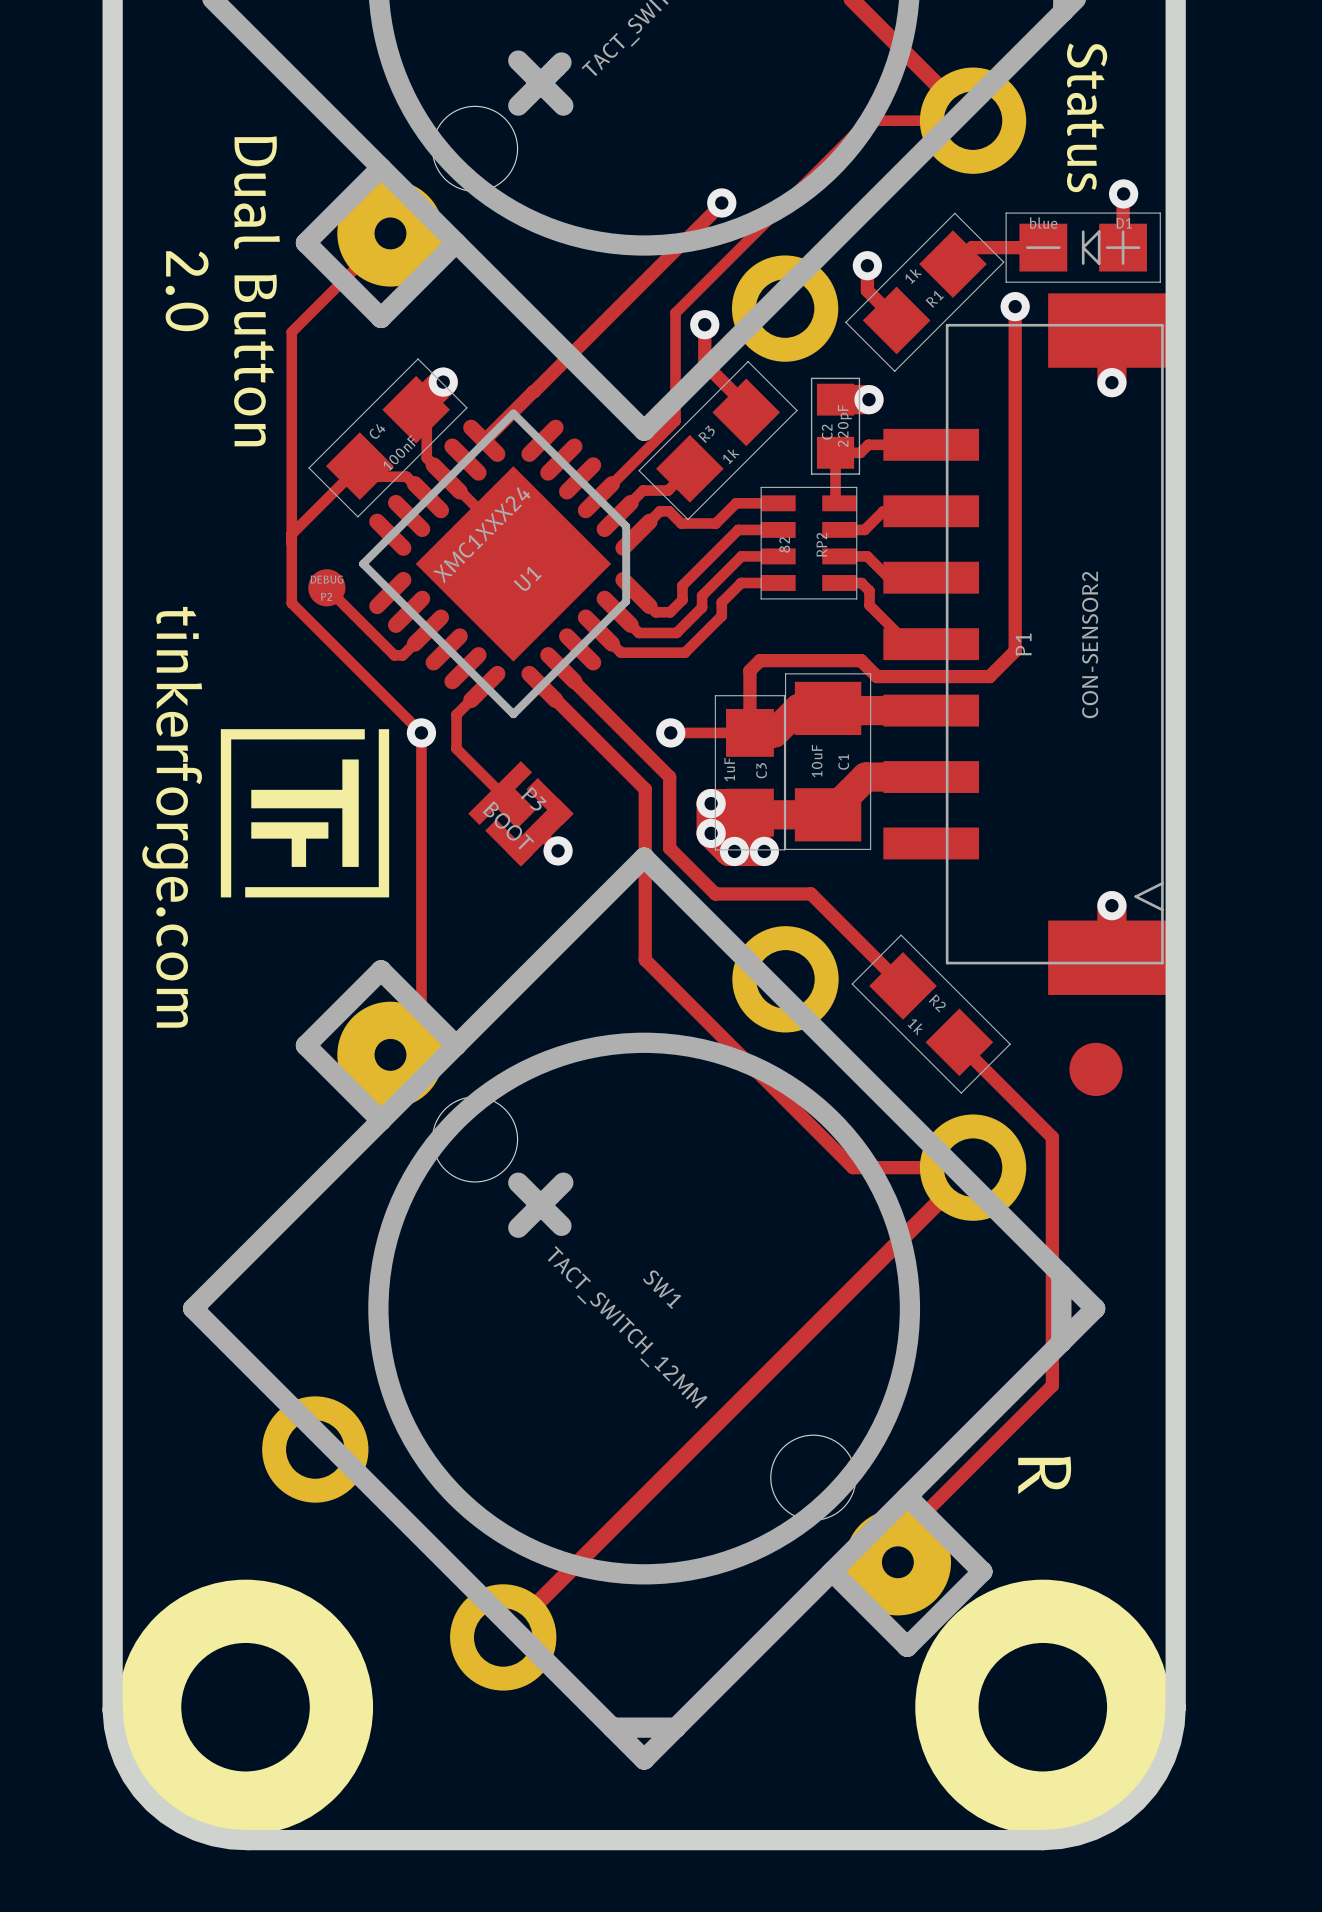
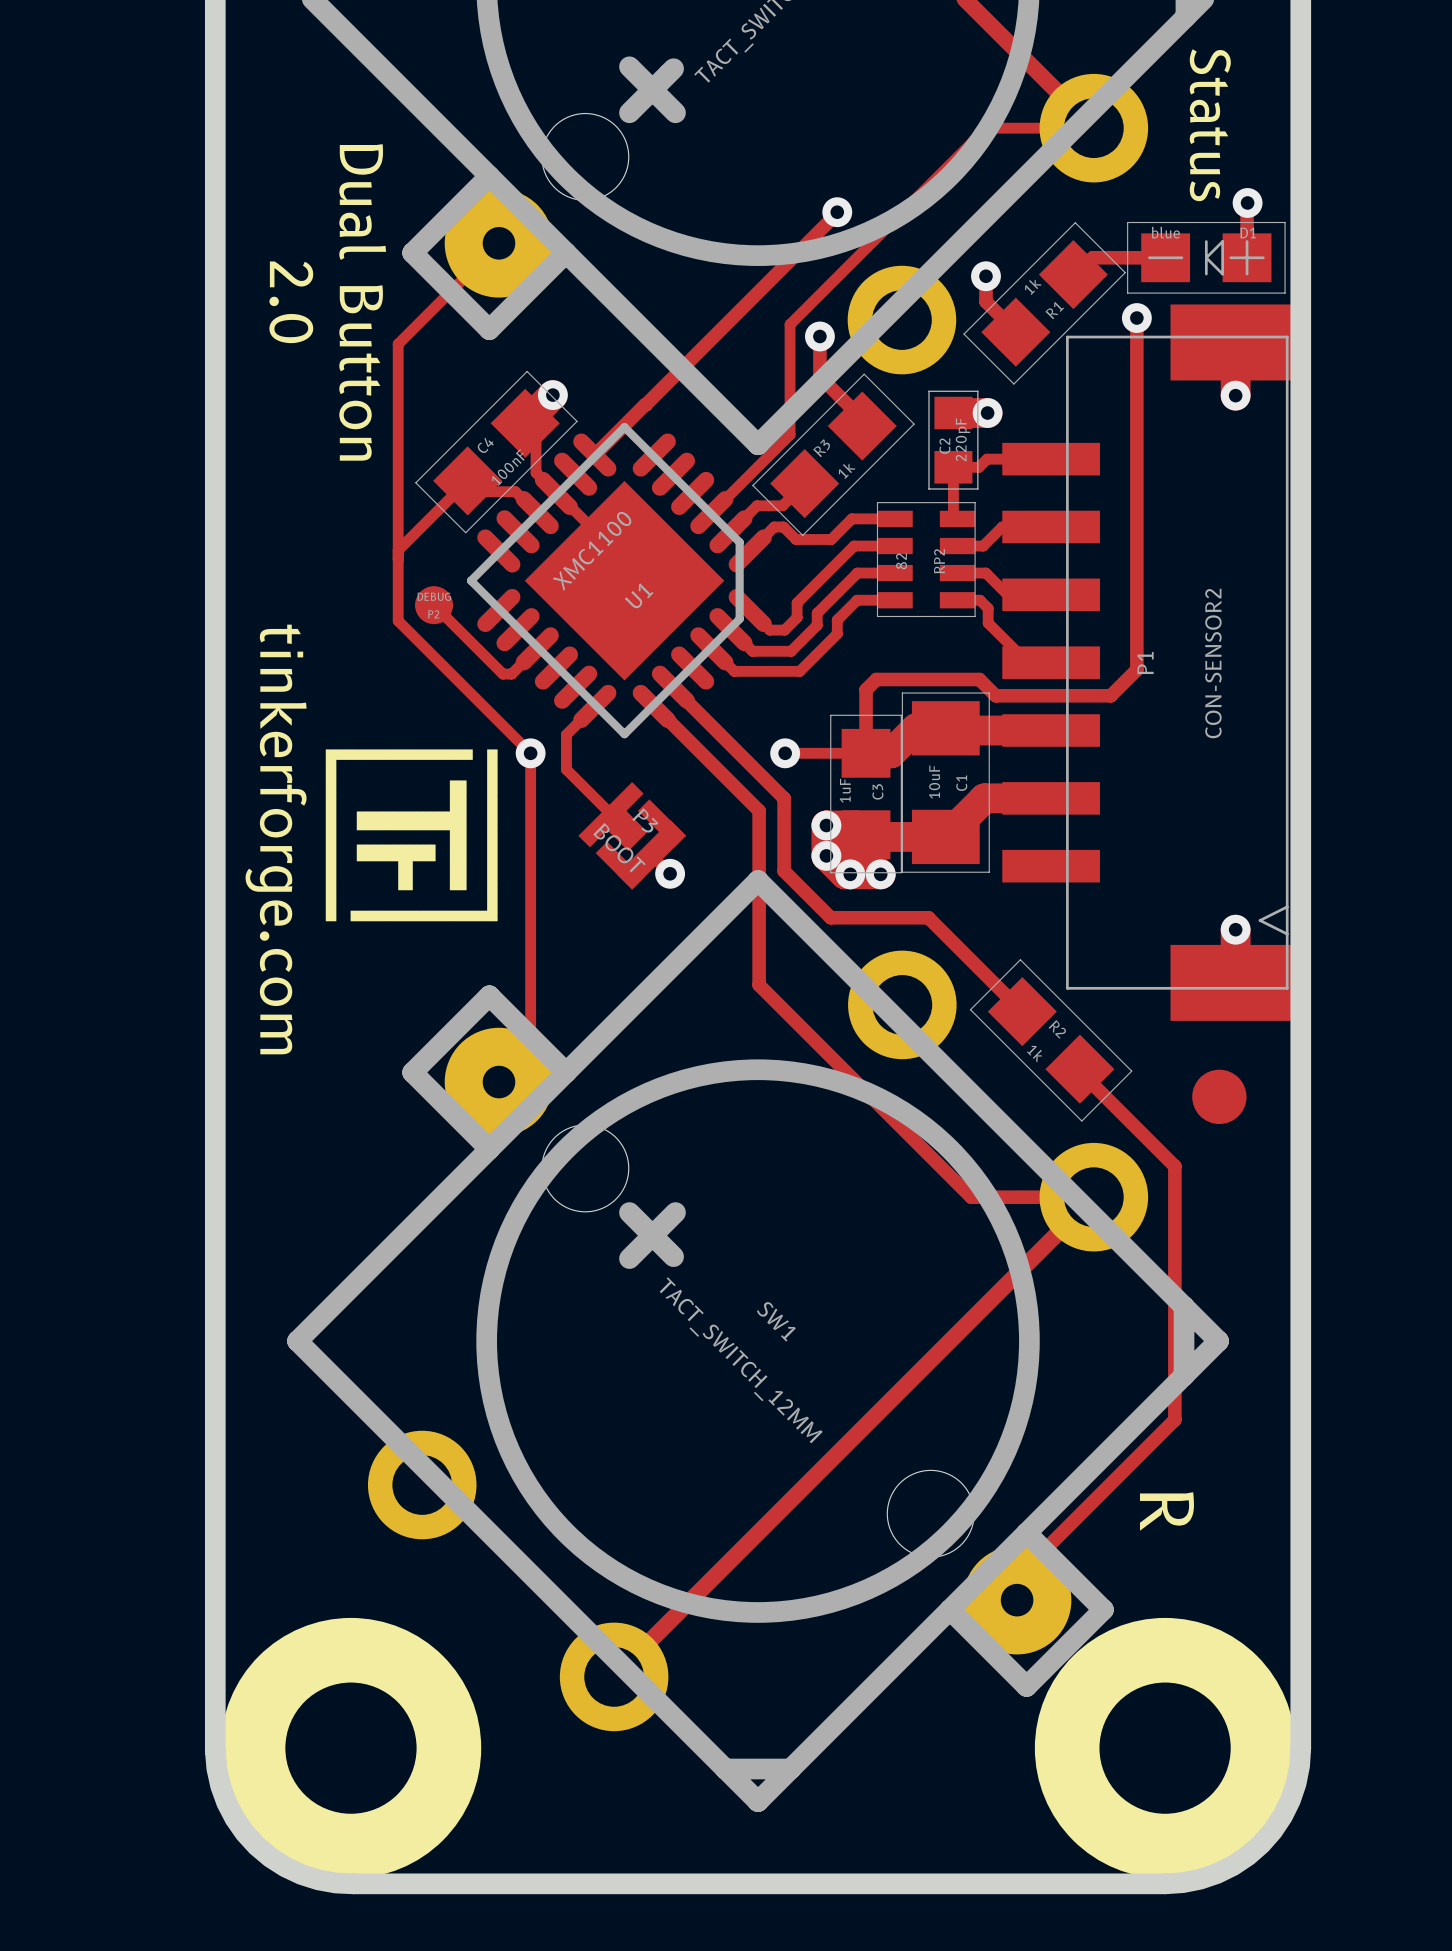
U1 value: XMC1XXX24 (481, 535) -> XMC1100 (591, 551)

